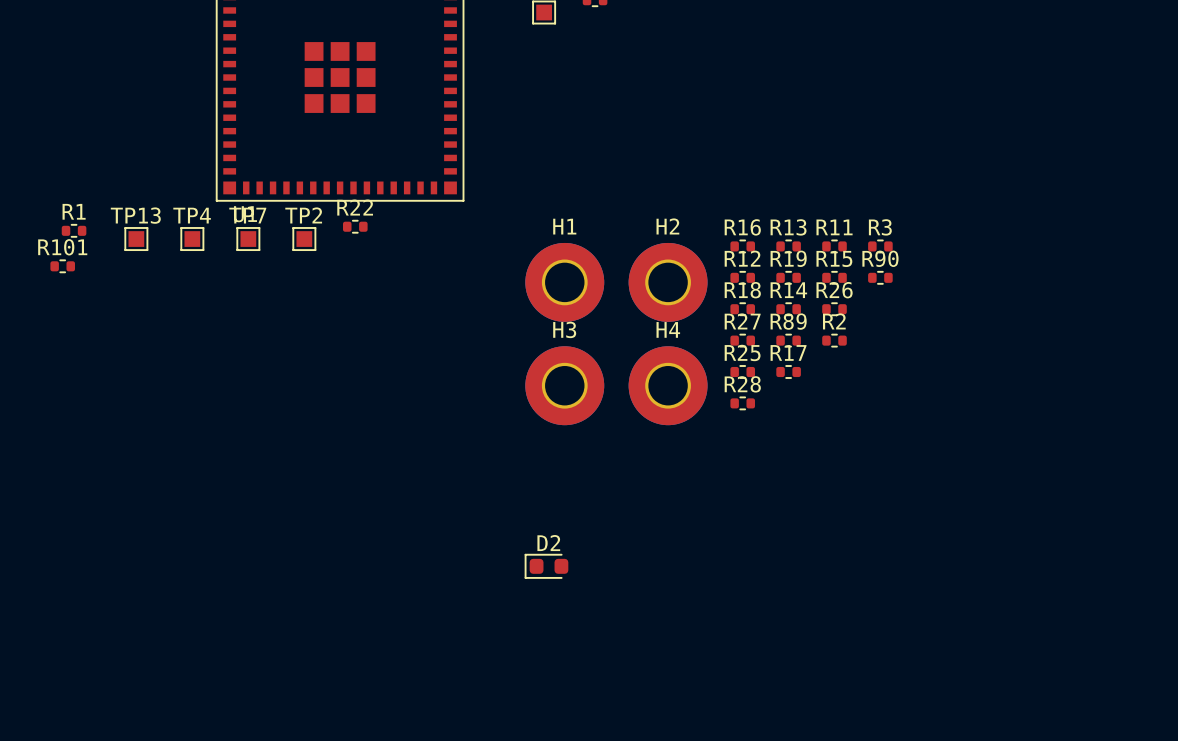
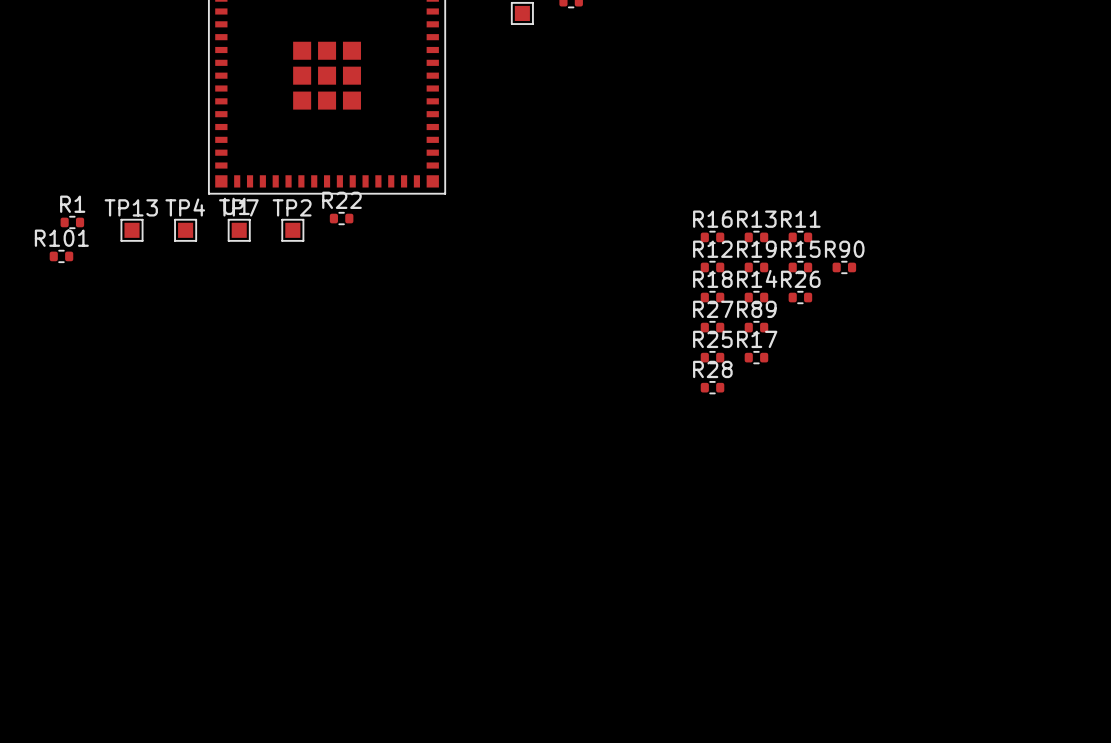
R3: (880, 246) -> none
H1: (564, 282) -> none
H2: (668, 282) -> none
R2: (834, 340) -> none
H3: (564, 385) -> none
H4: (668, 385) -> none
D2: (546, 566) -> none

